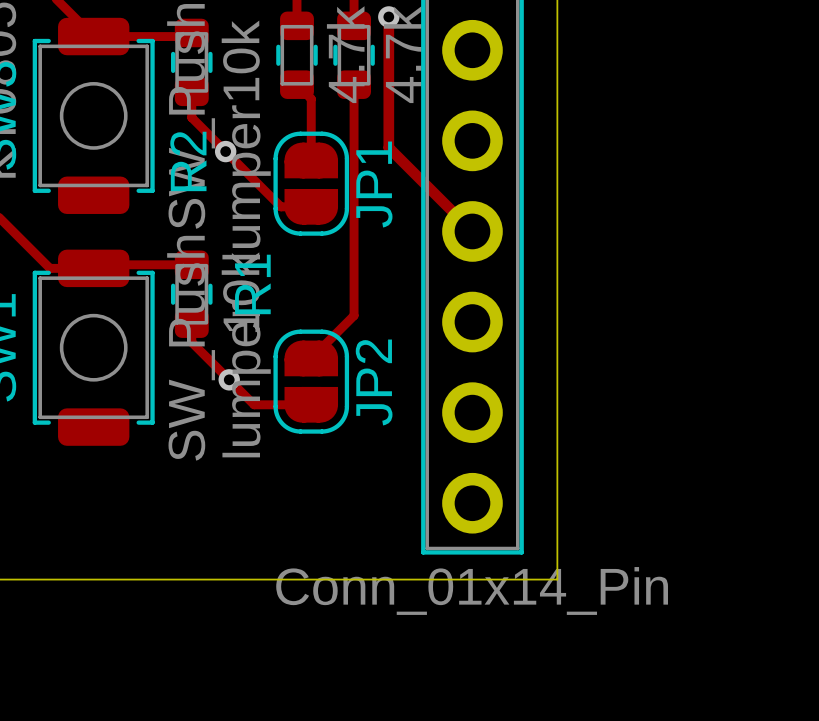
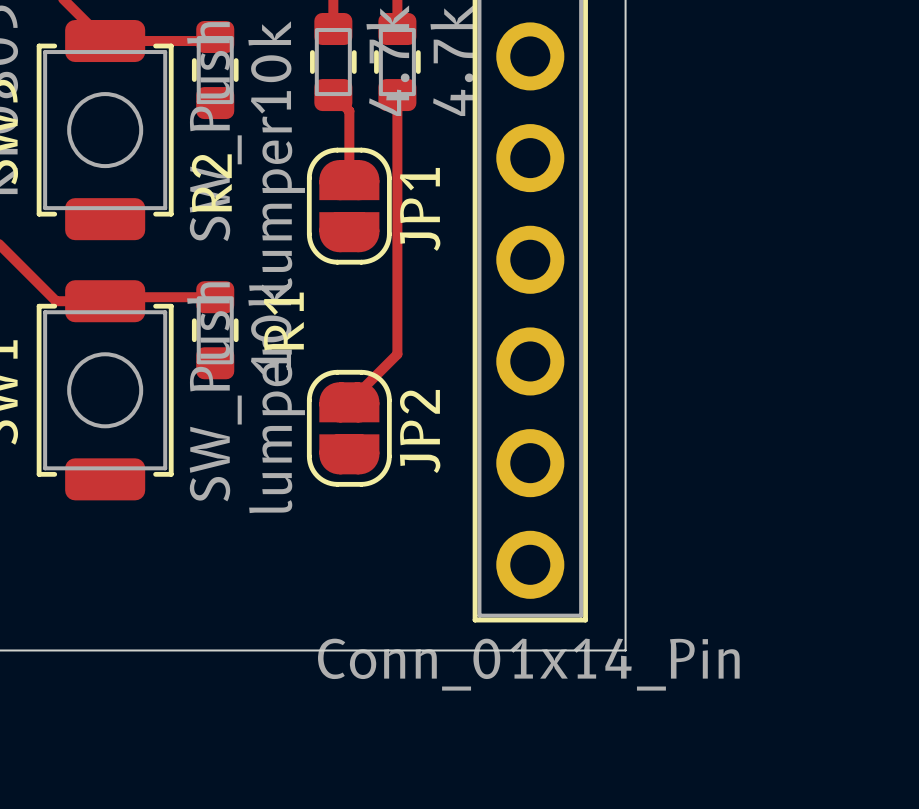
track: (388, 16) (388, 147) (472, 231) -> none
via: (388, 16) -> none
track: (191, 91) (191, 117) (280, 206) (311, 206) -> none
via: (225, 151) -> none
track: (191, 323) (191, 342) (254, 404) (311, 404) -> none
via: (229, 379) -> none

